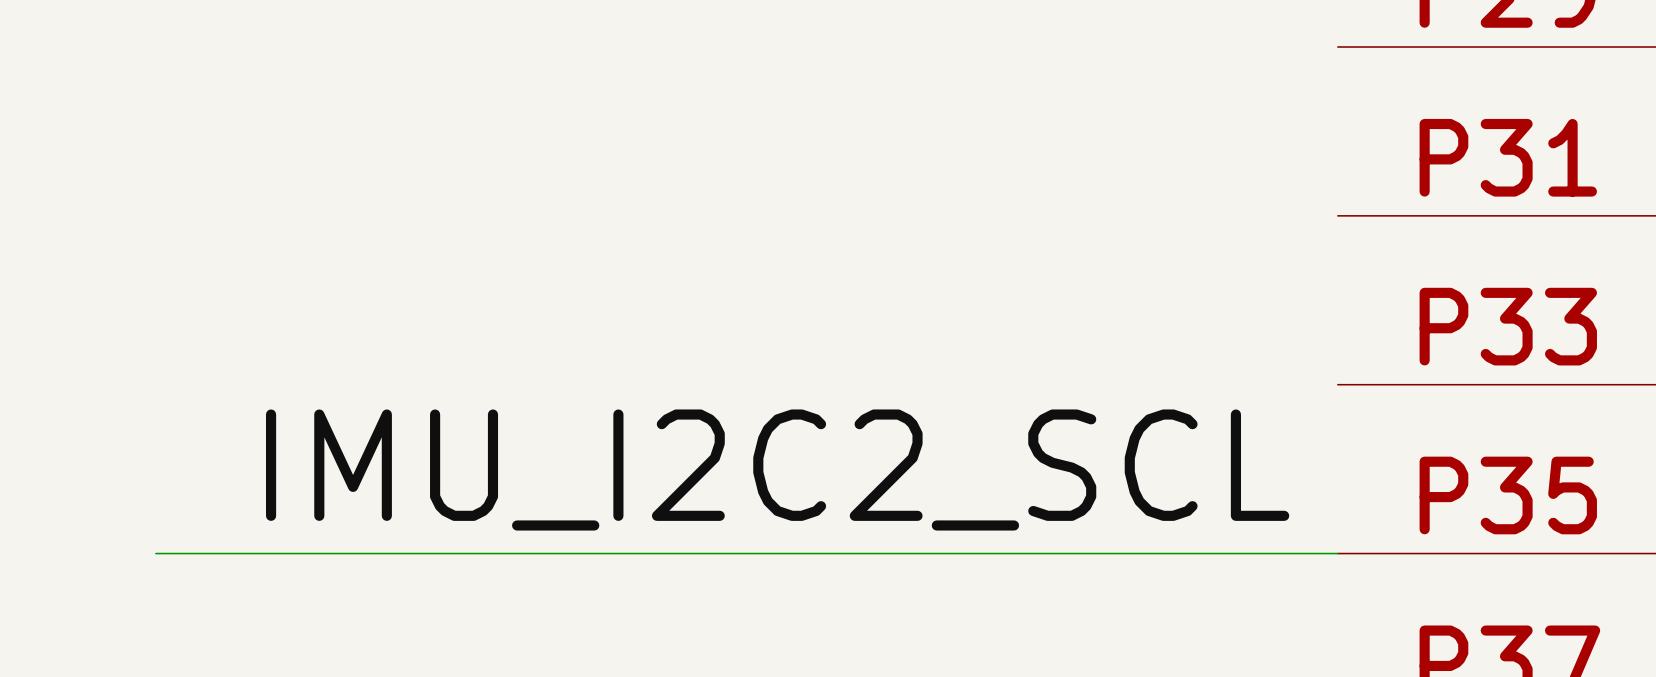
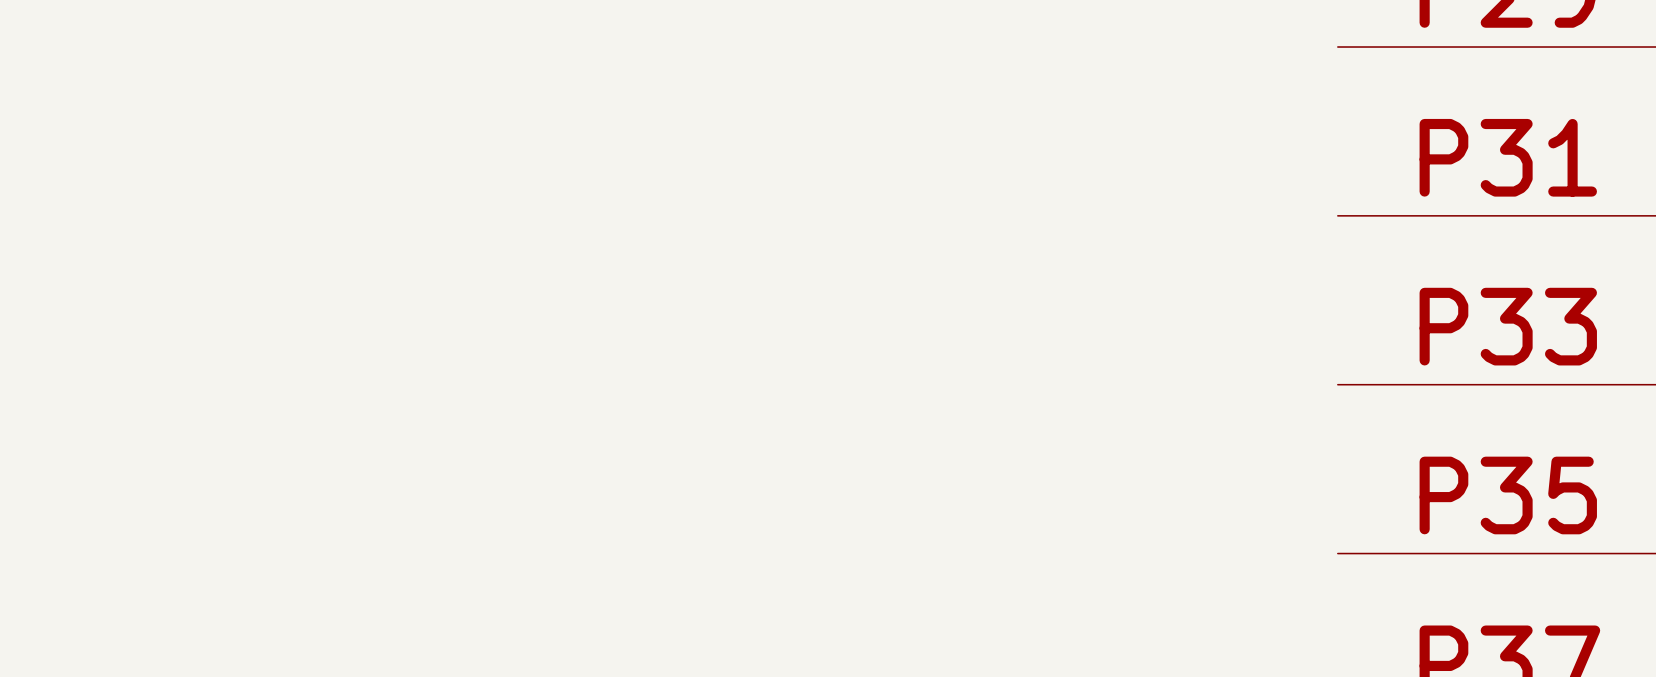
label: IMU_I2C2_SCL (777, 470) -> none
wire: (155, 553) (1337, 553) -> none

